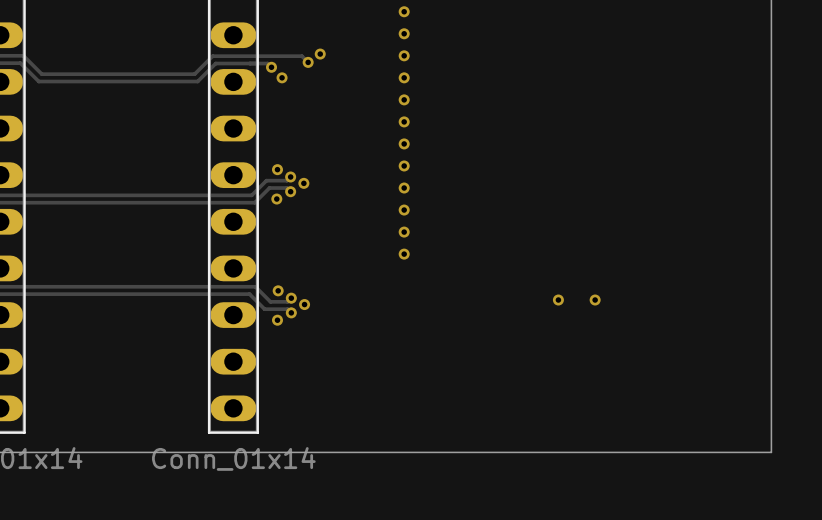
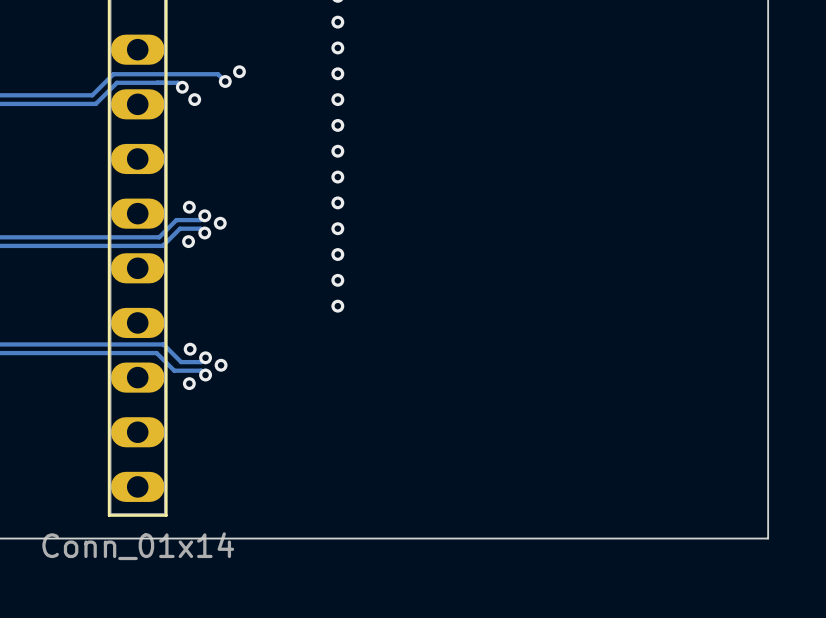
via: (558, 300) -> none
via: (595, 300) -> none

